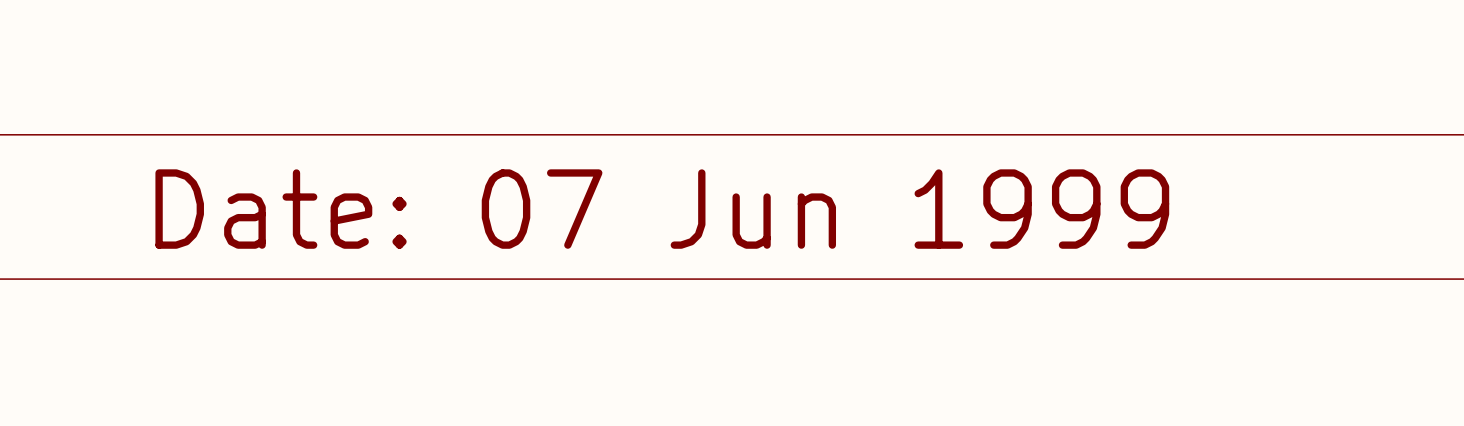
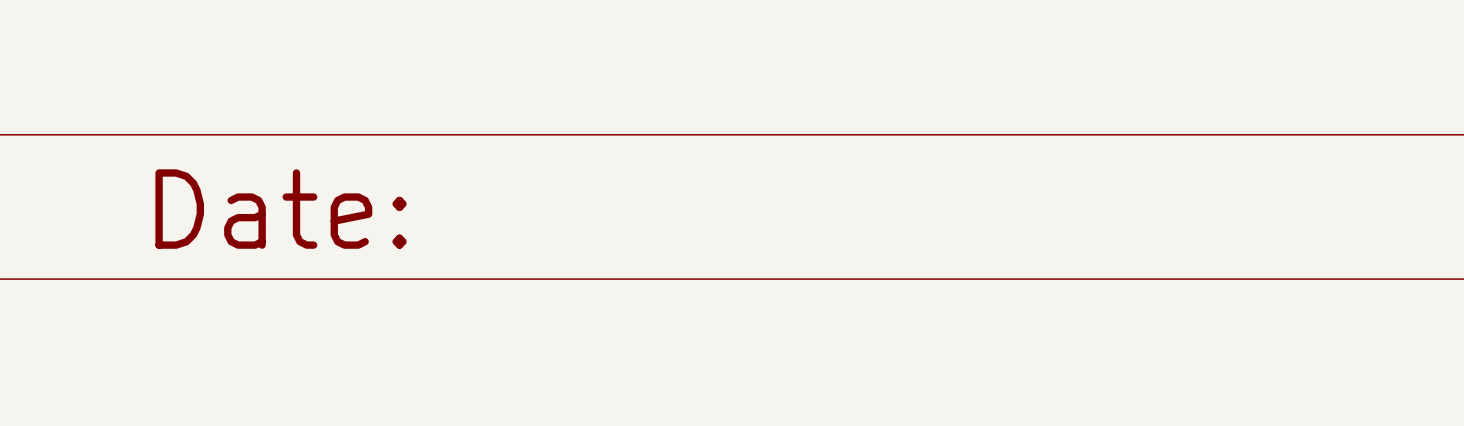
title block: Date: 07 Jun 1999 (662, 209) -> Date: (281, 209)

